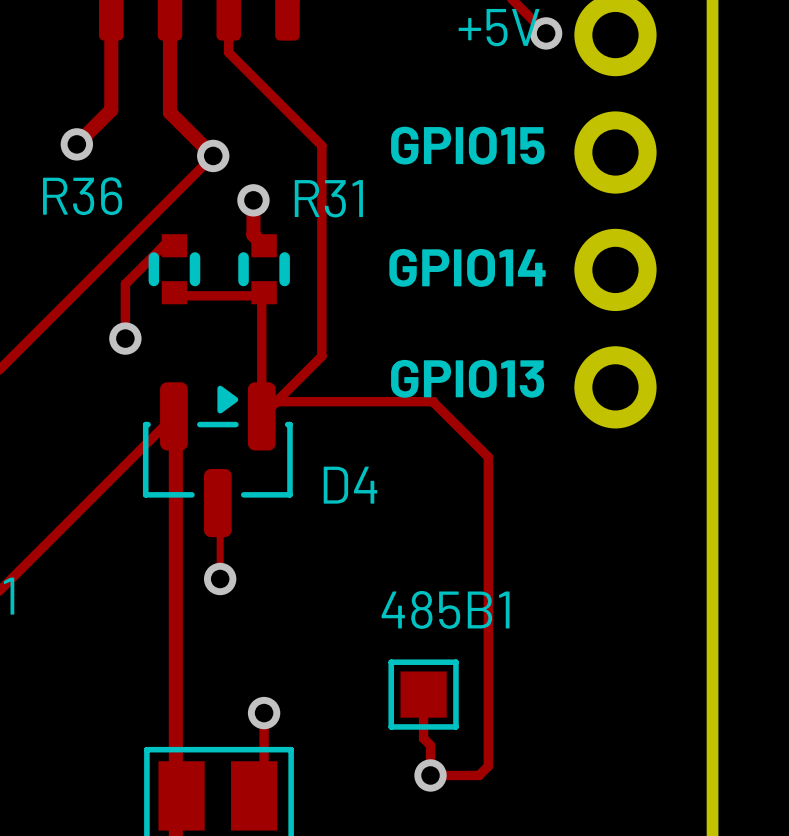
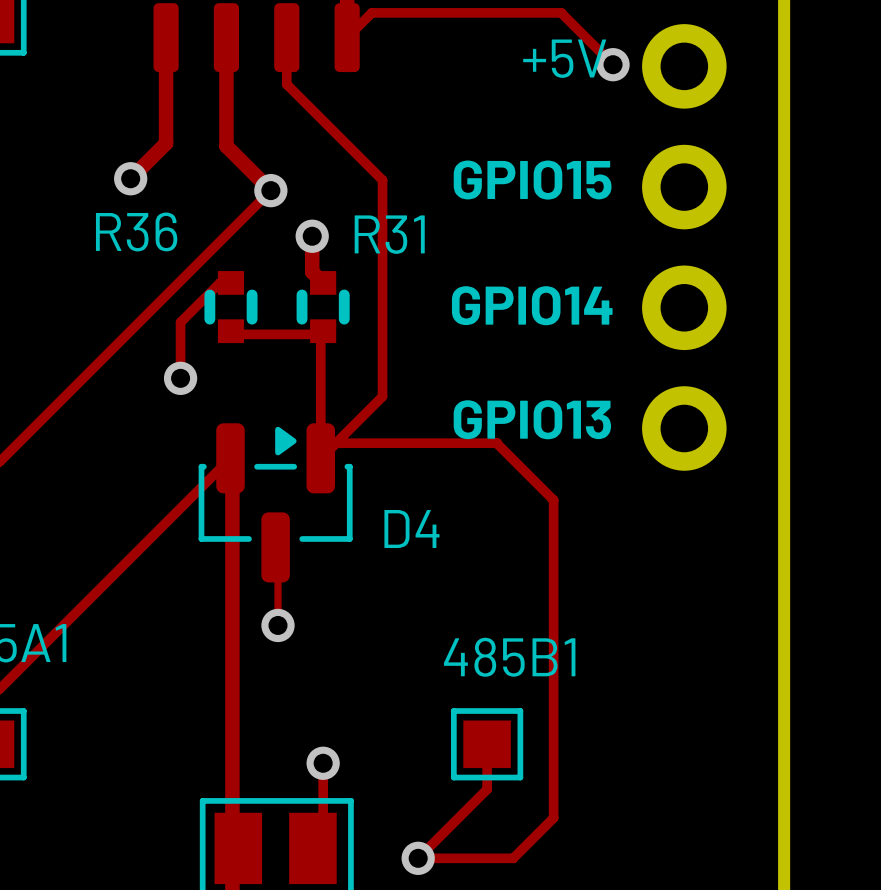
track: (423, 738) (430, 745) (430, 775) (479, 775) -> (487, 789) (418, 858) (513, 858) (544, 827)
via position: (430, 775) -> (418, 858)

